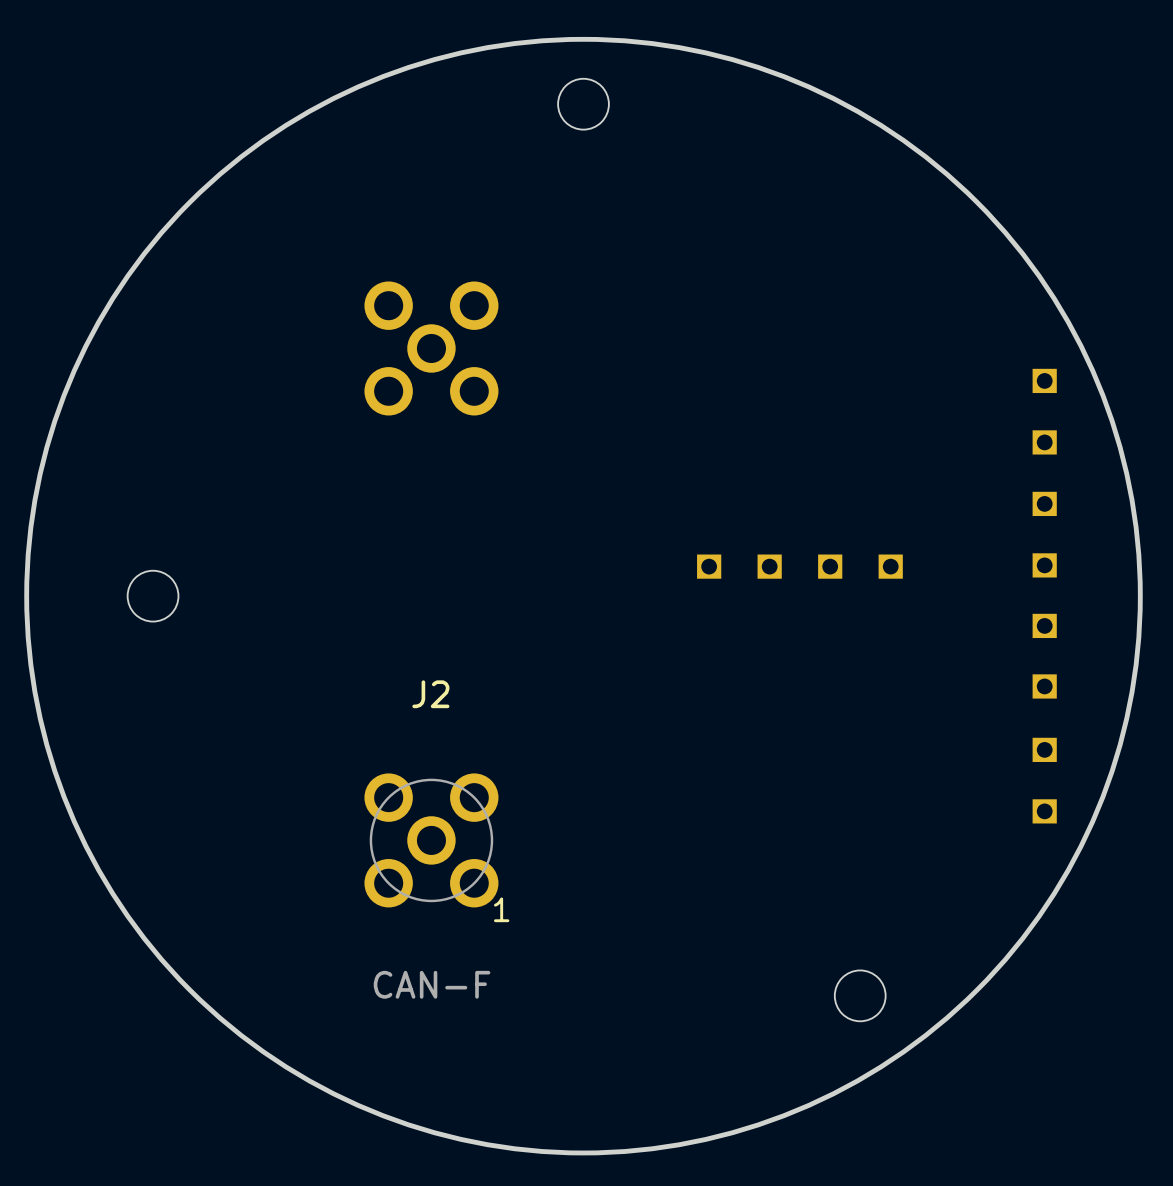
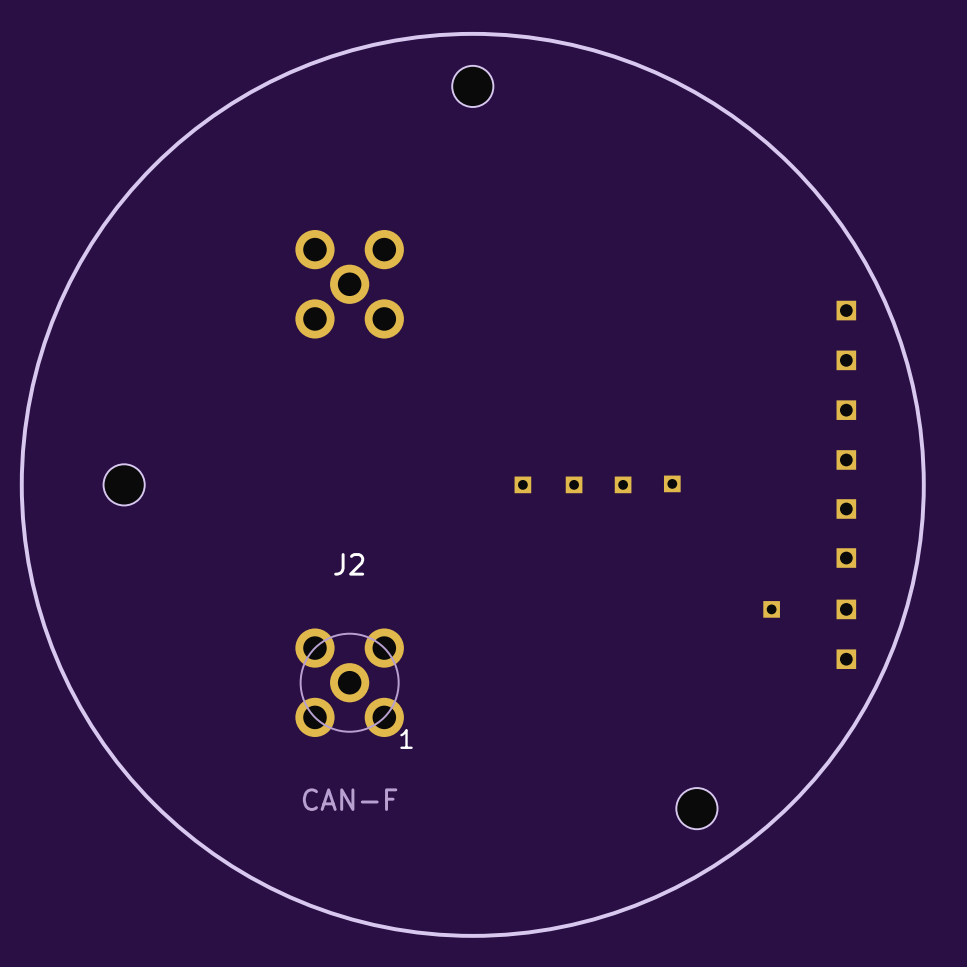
part: (709, 566) -> none
part: (769, 566) -> none
part: (830, 566) -> none
part: (890, 566) -> none
part: none -> (672, 483)
part: none -> (522, 484)
part: none -> (574, 484)
part: none -> (623, 484)
part: none -> (771, 609)

